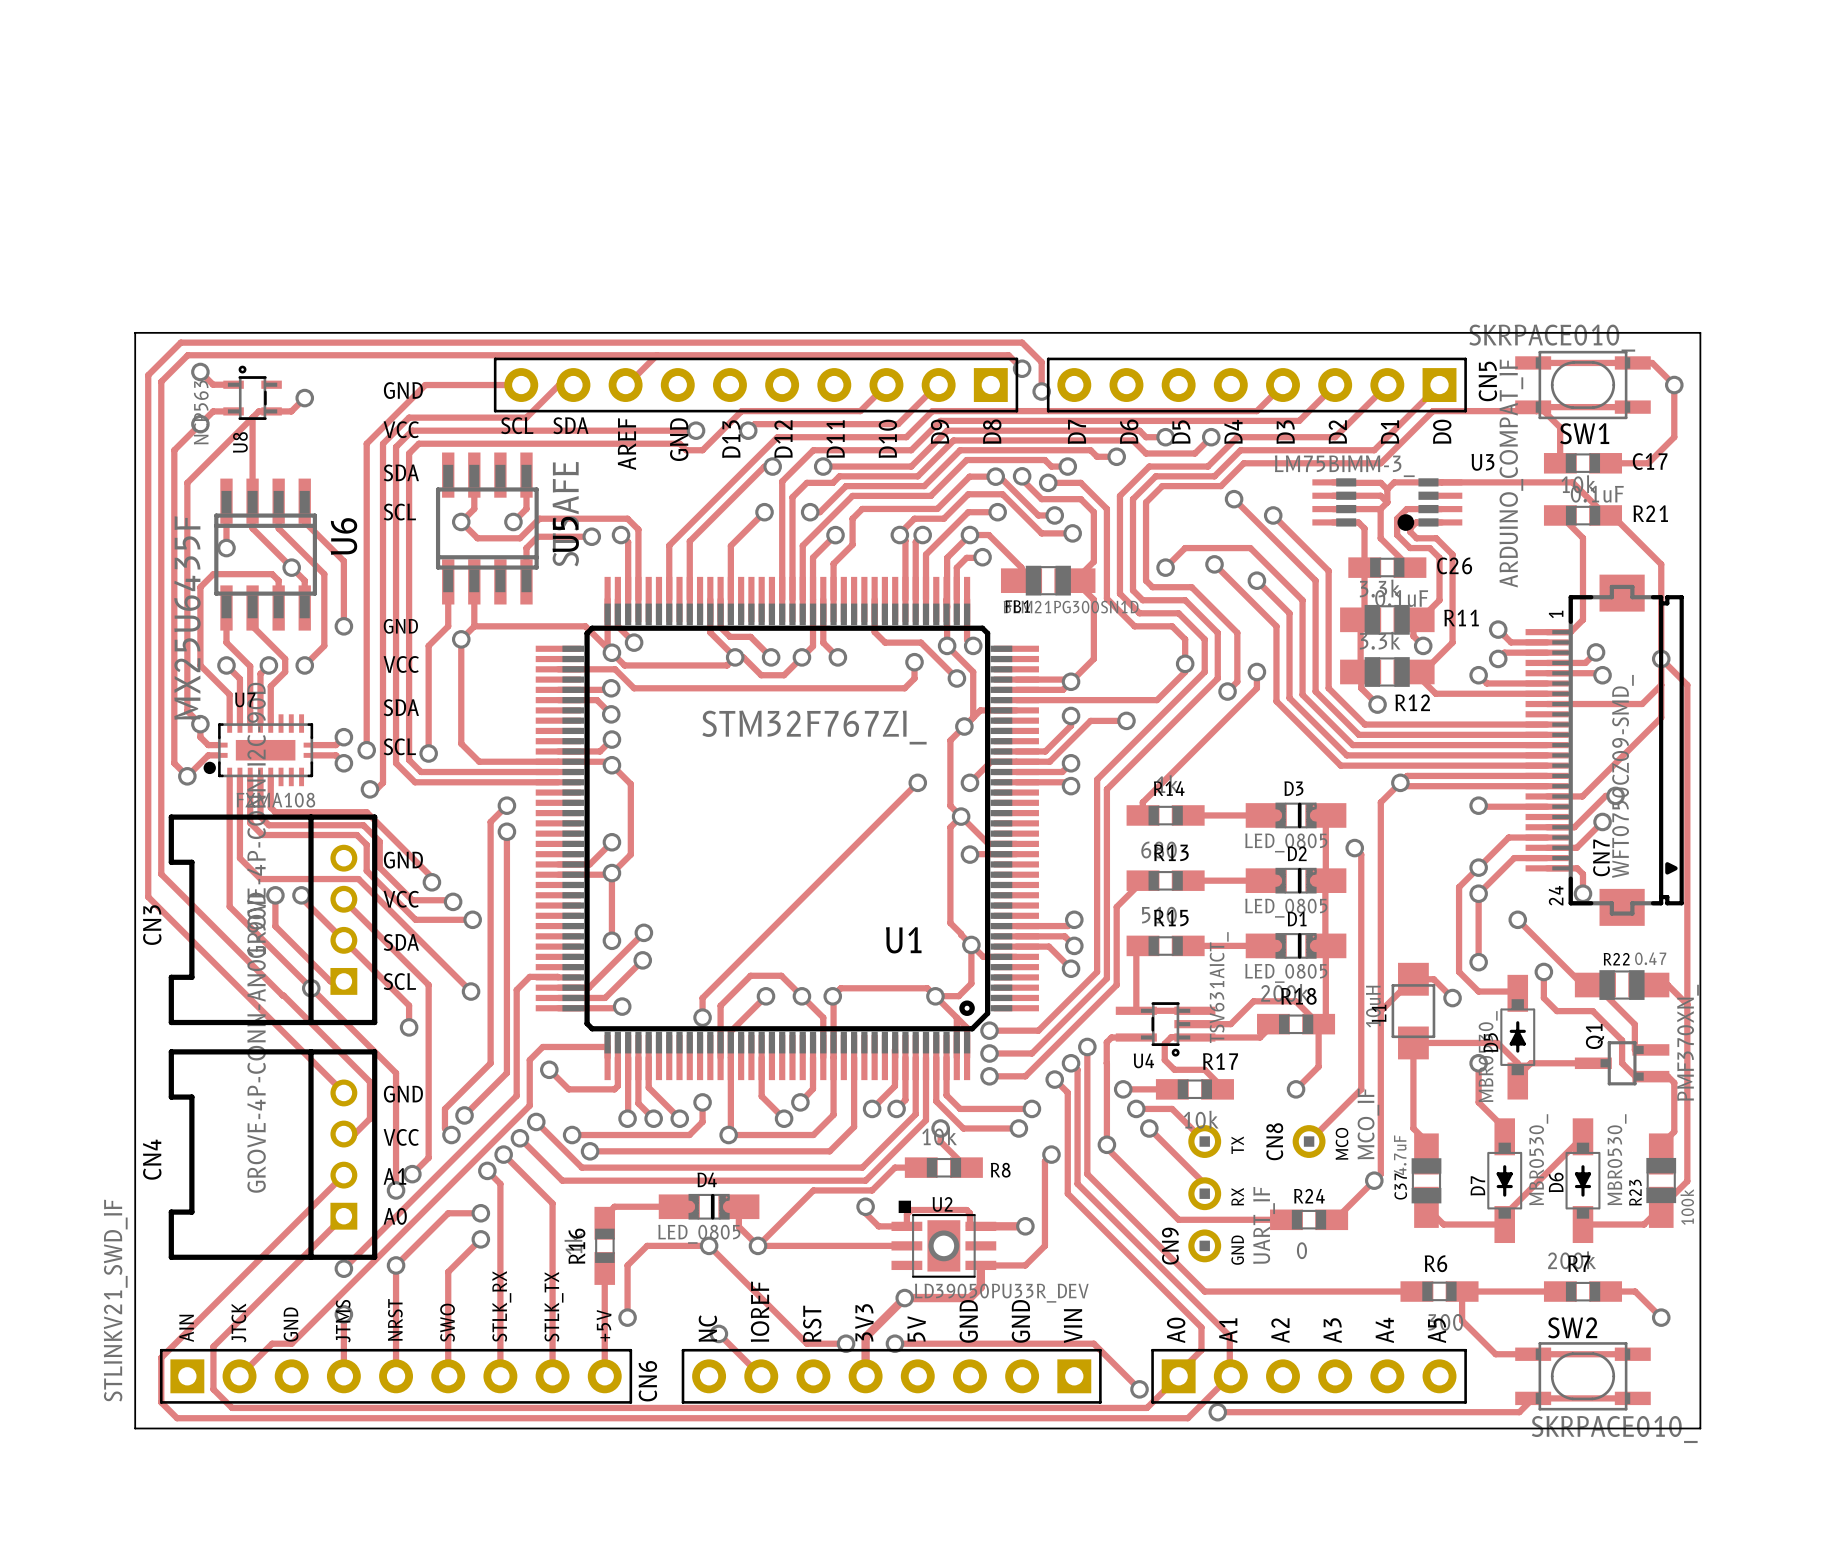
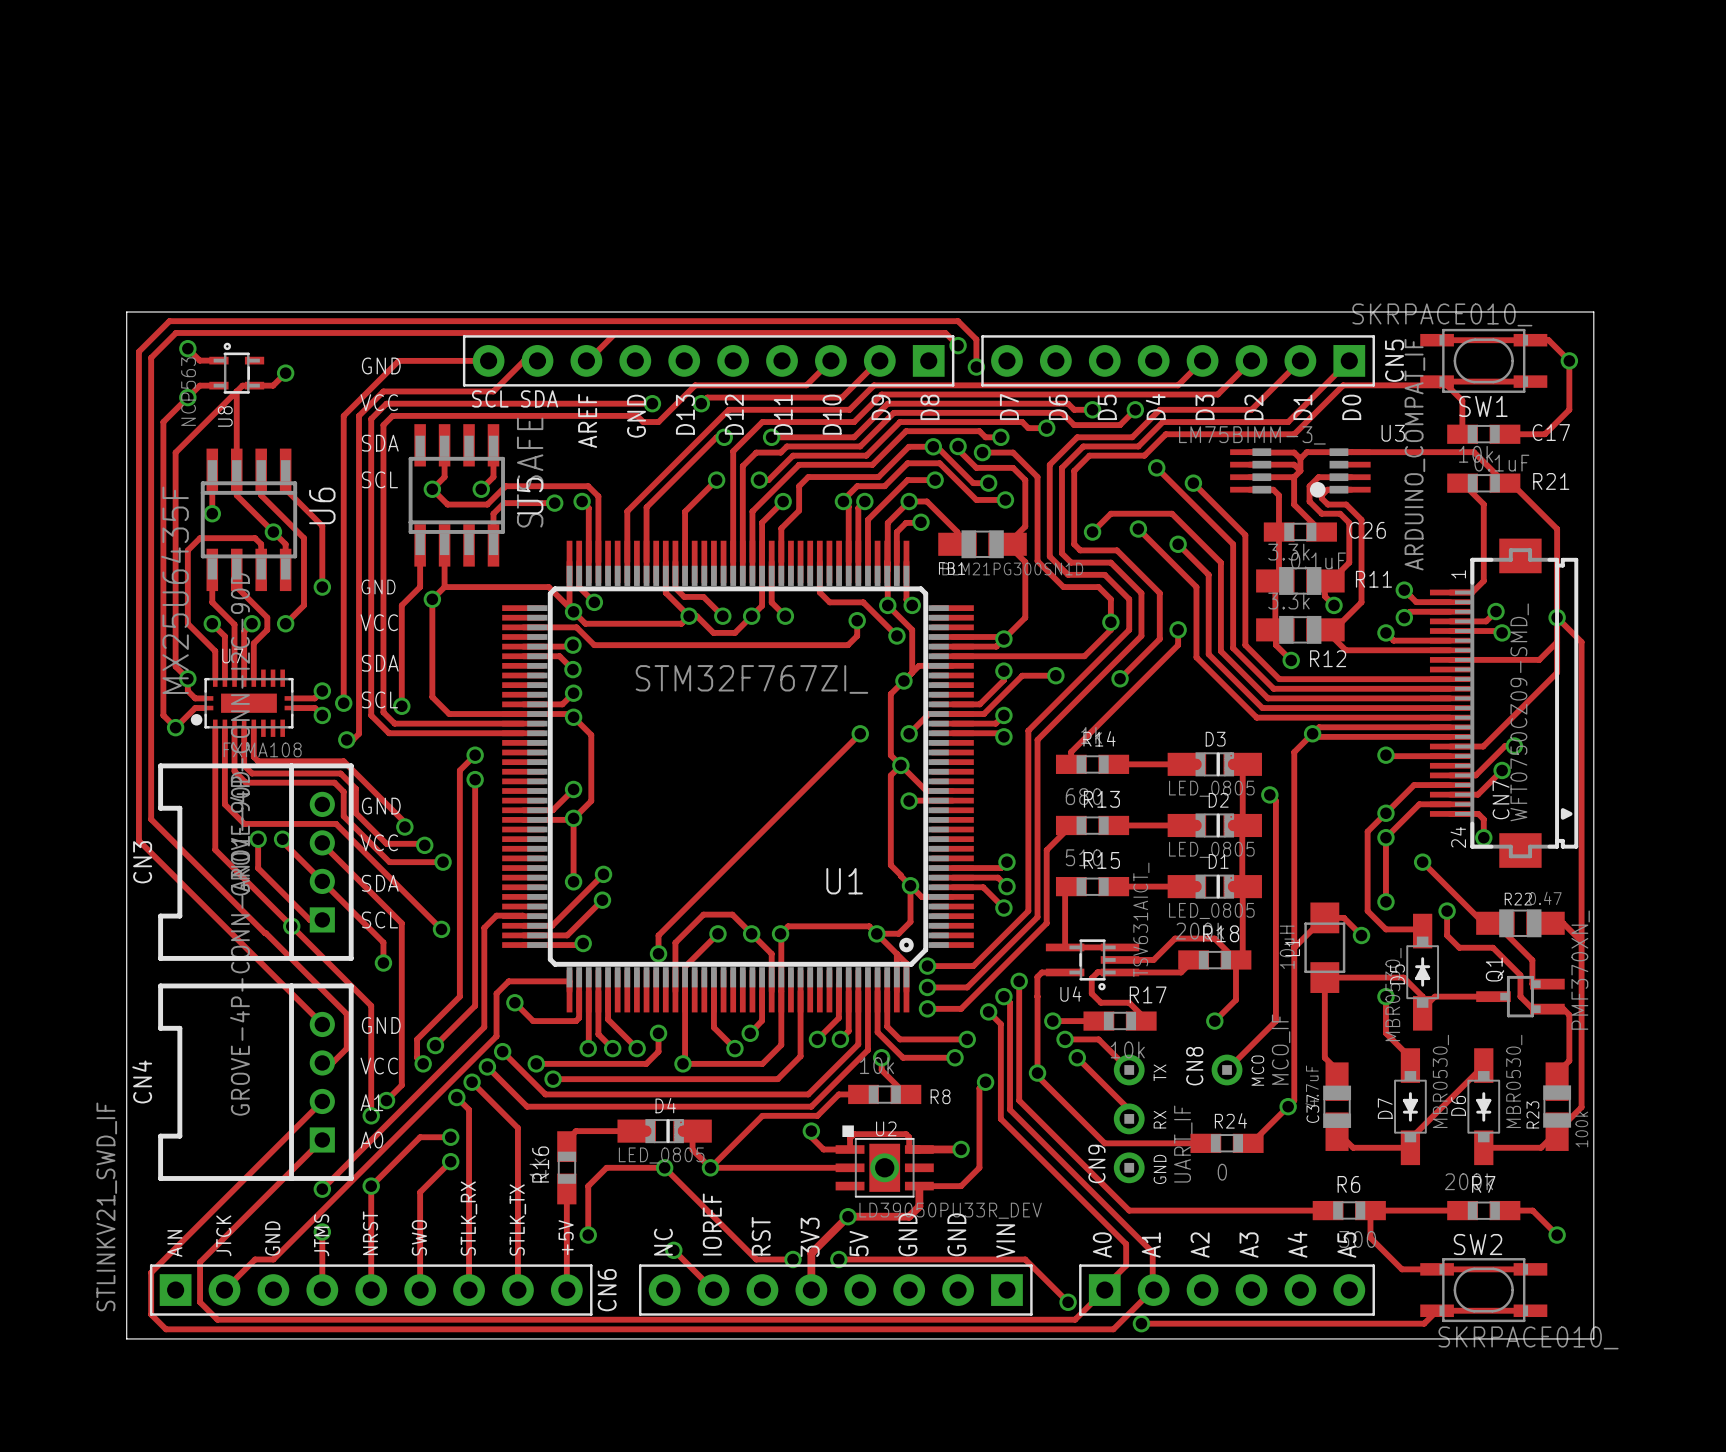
track: none -> (1150, 648) (1120, 678)
via position: (1227, 691) -> (1120, 678)

